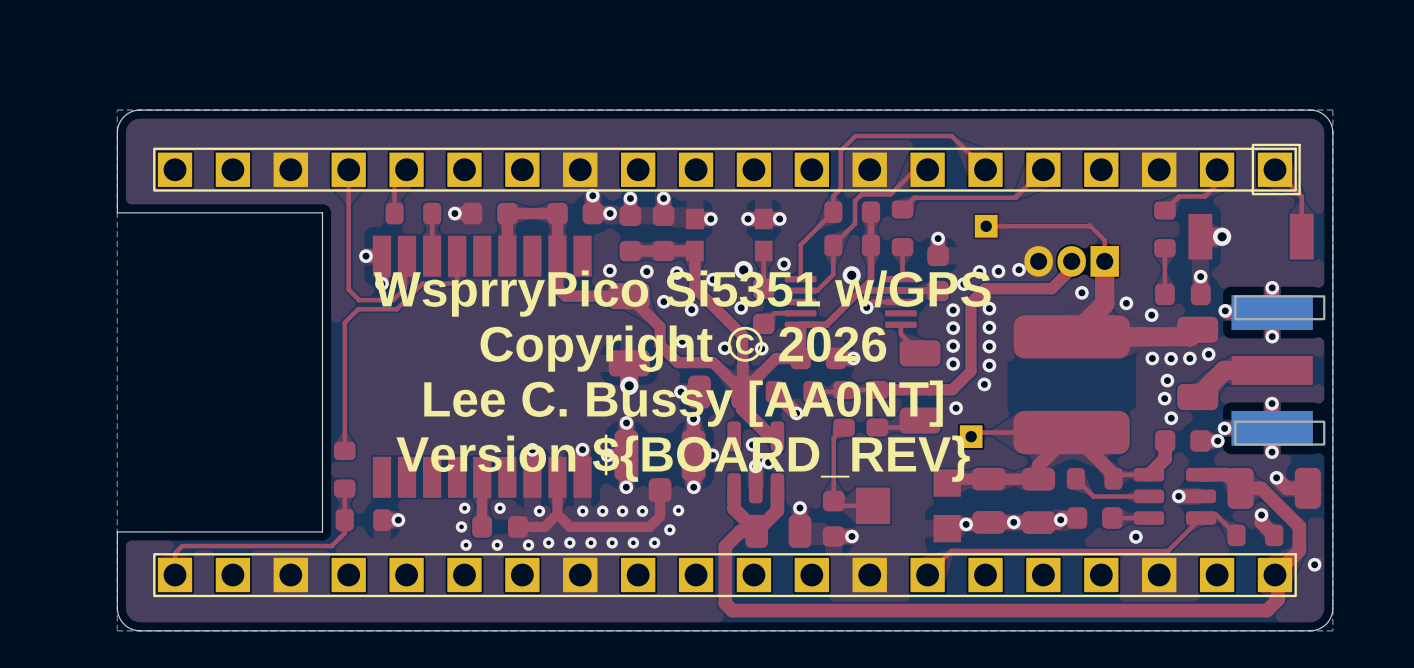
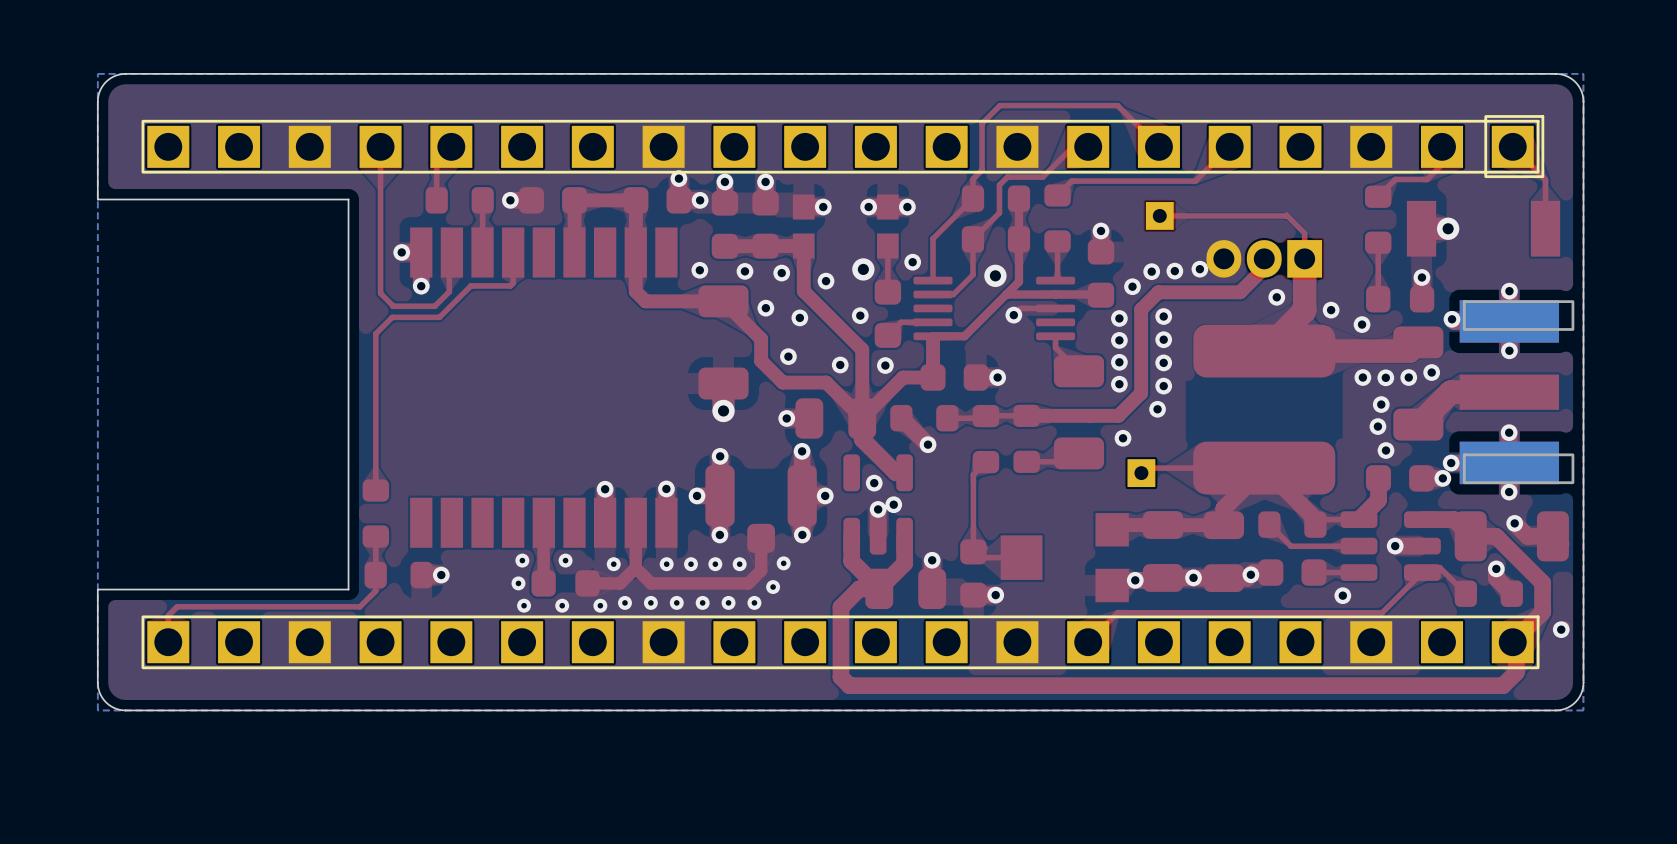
text: WsprryPico Si5351 w/GPS (682, 293) -> none
text: Copyright © 2026 (683, 348) -> none
text: Lee C. Bussy [AA0NT] (683, 403) -> none
text: Version ${BOARD_REV} (683, 458) -> none

